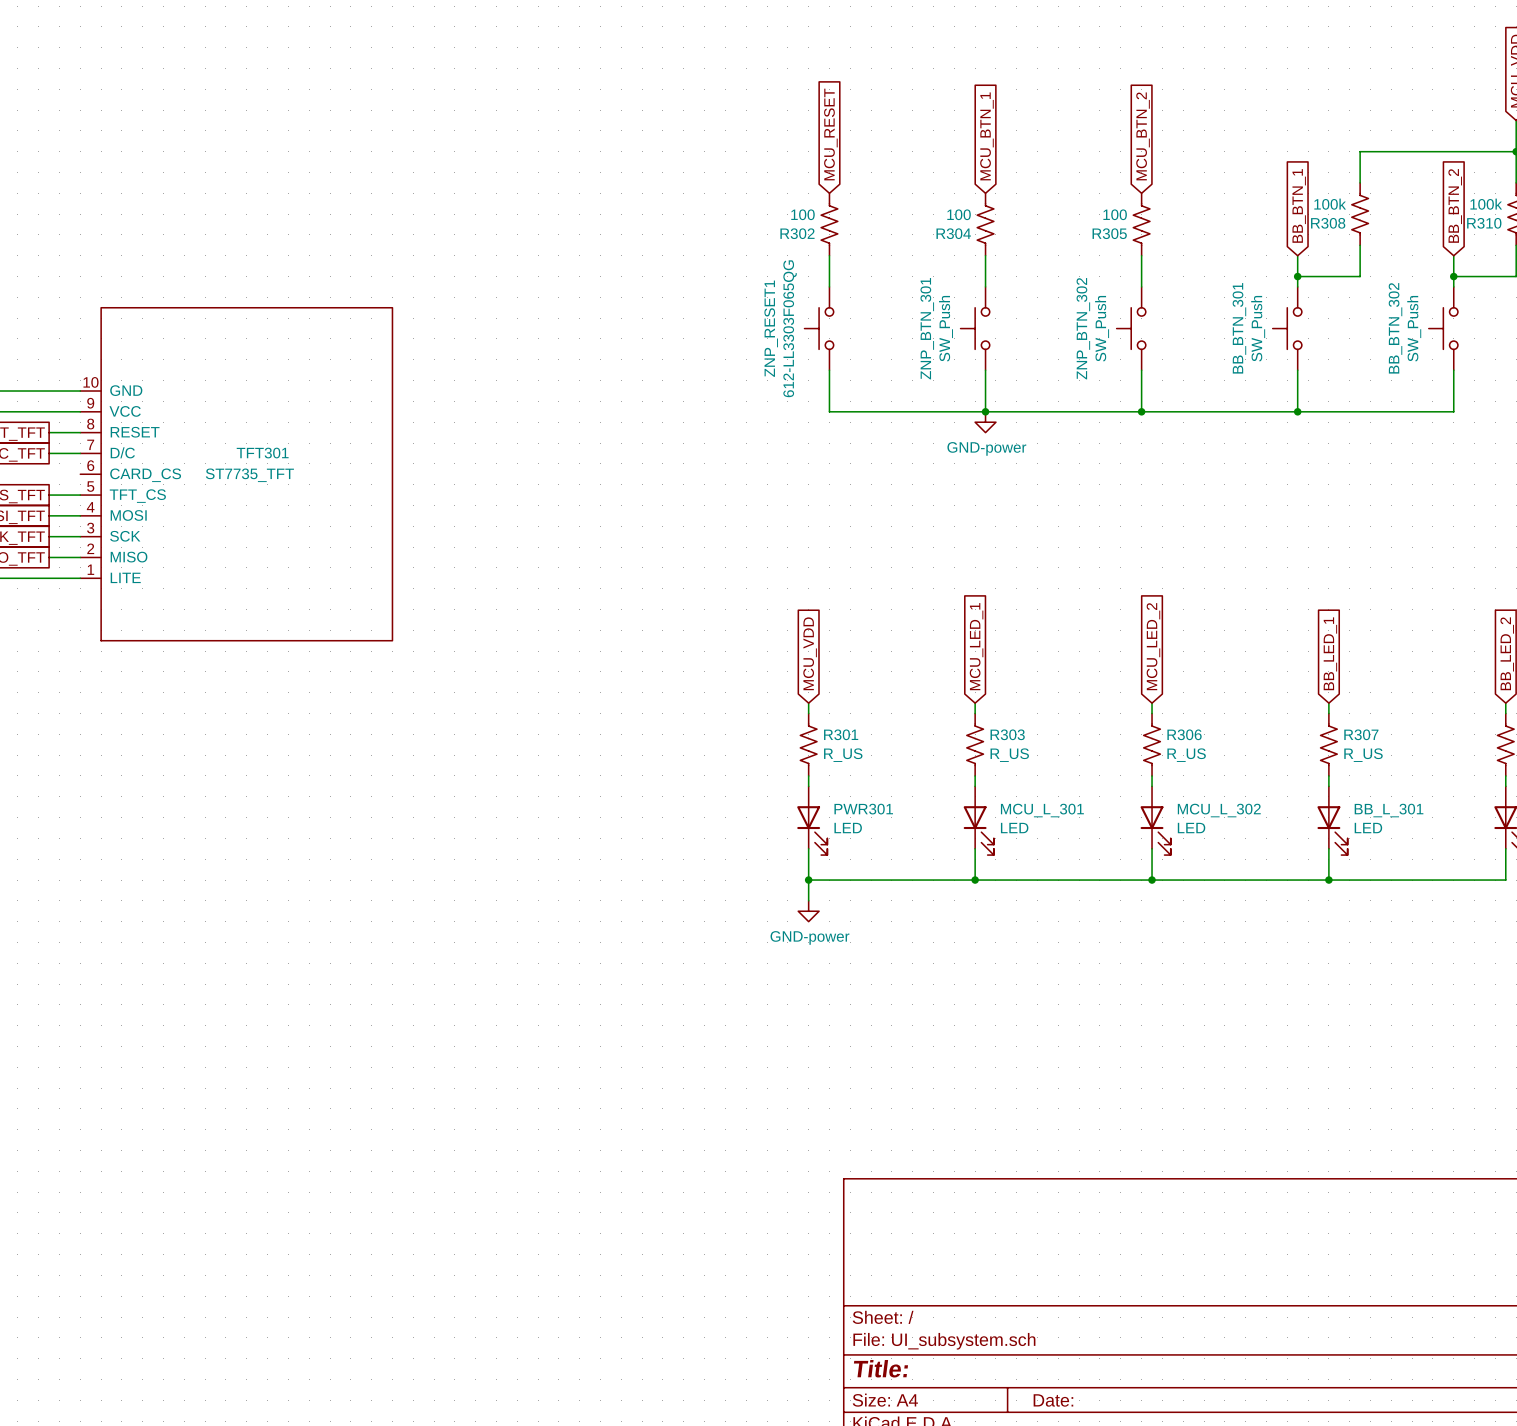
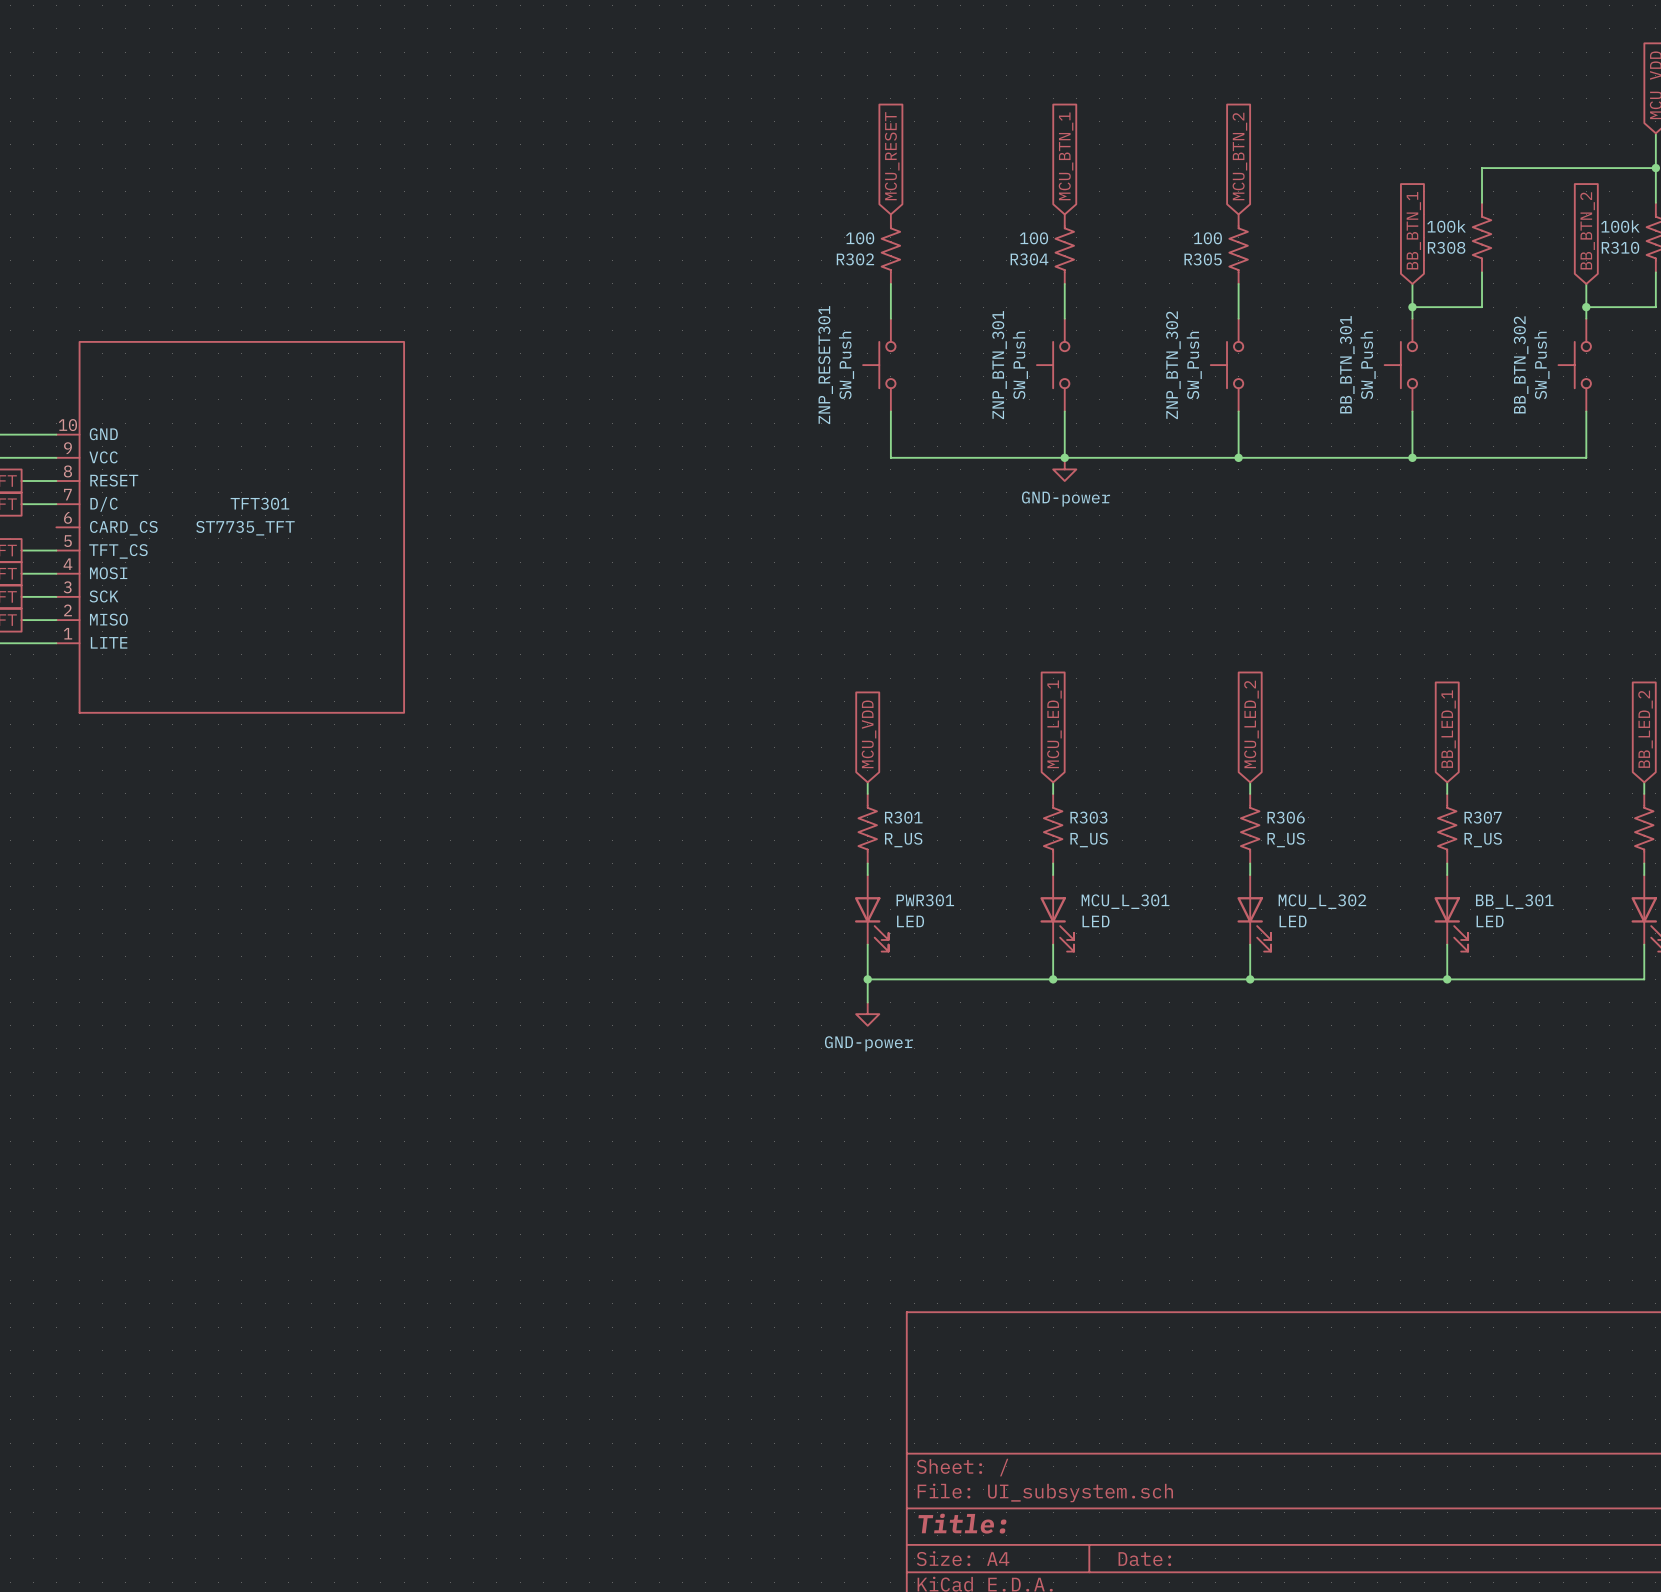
ZNP_RESET1 name: ZNP_RESET1 (771, 328) -> ZNP_RESET301 (825, 365)
ZNP_RESET1 value: 612-LL3303F065QG (790, 328) -> SW_Push (846, 365)

